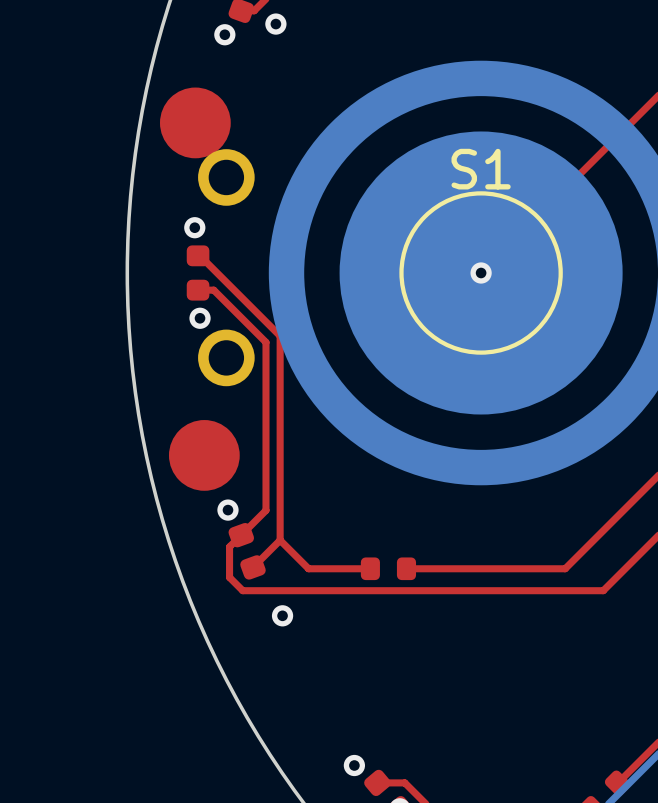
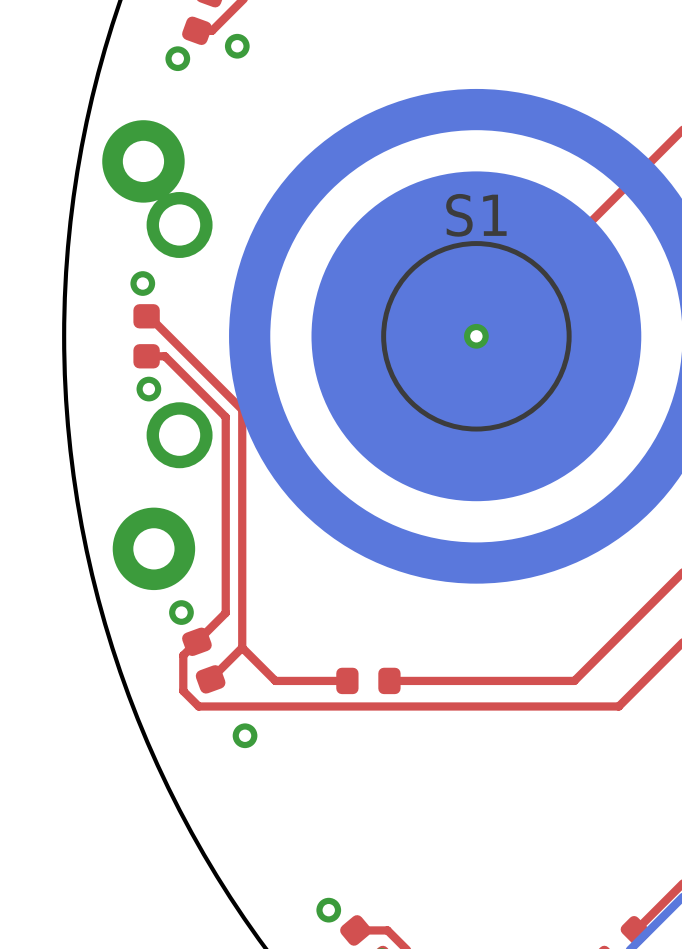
part footprint: [159, 87, 231, 159] -> [102, 120, 185, 203]
part footprint: [168, 420, 240, 491] -> [112, 507, 196, 591]

